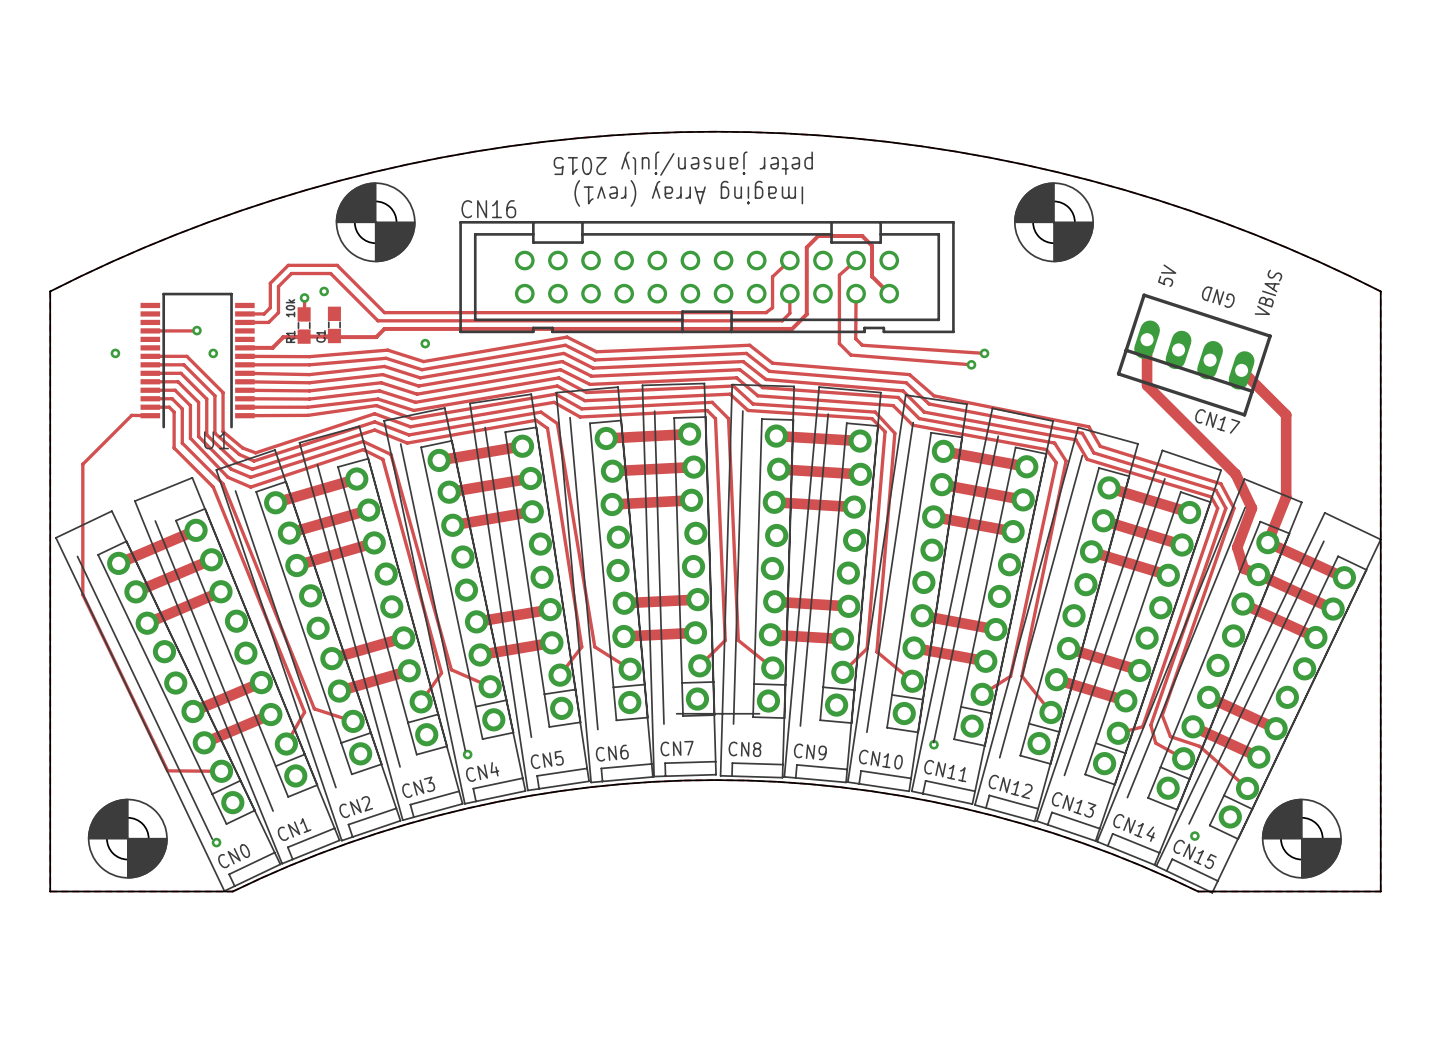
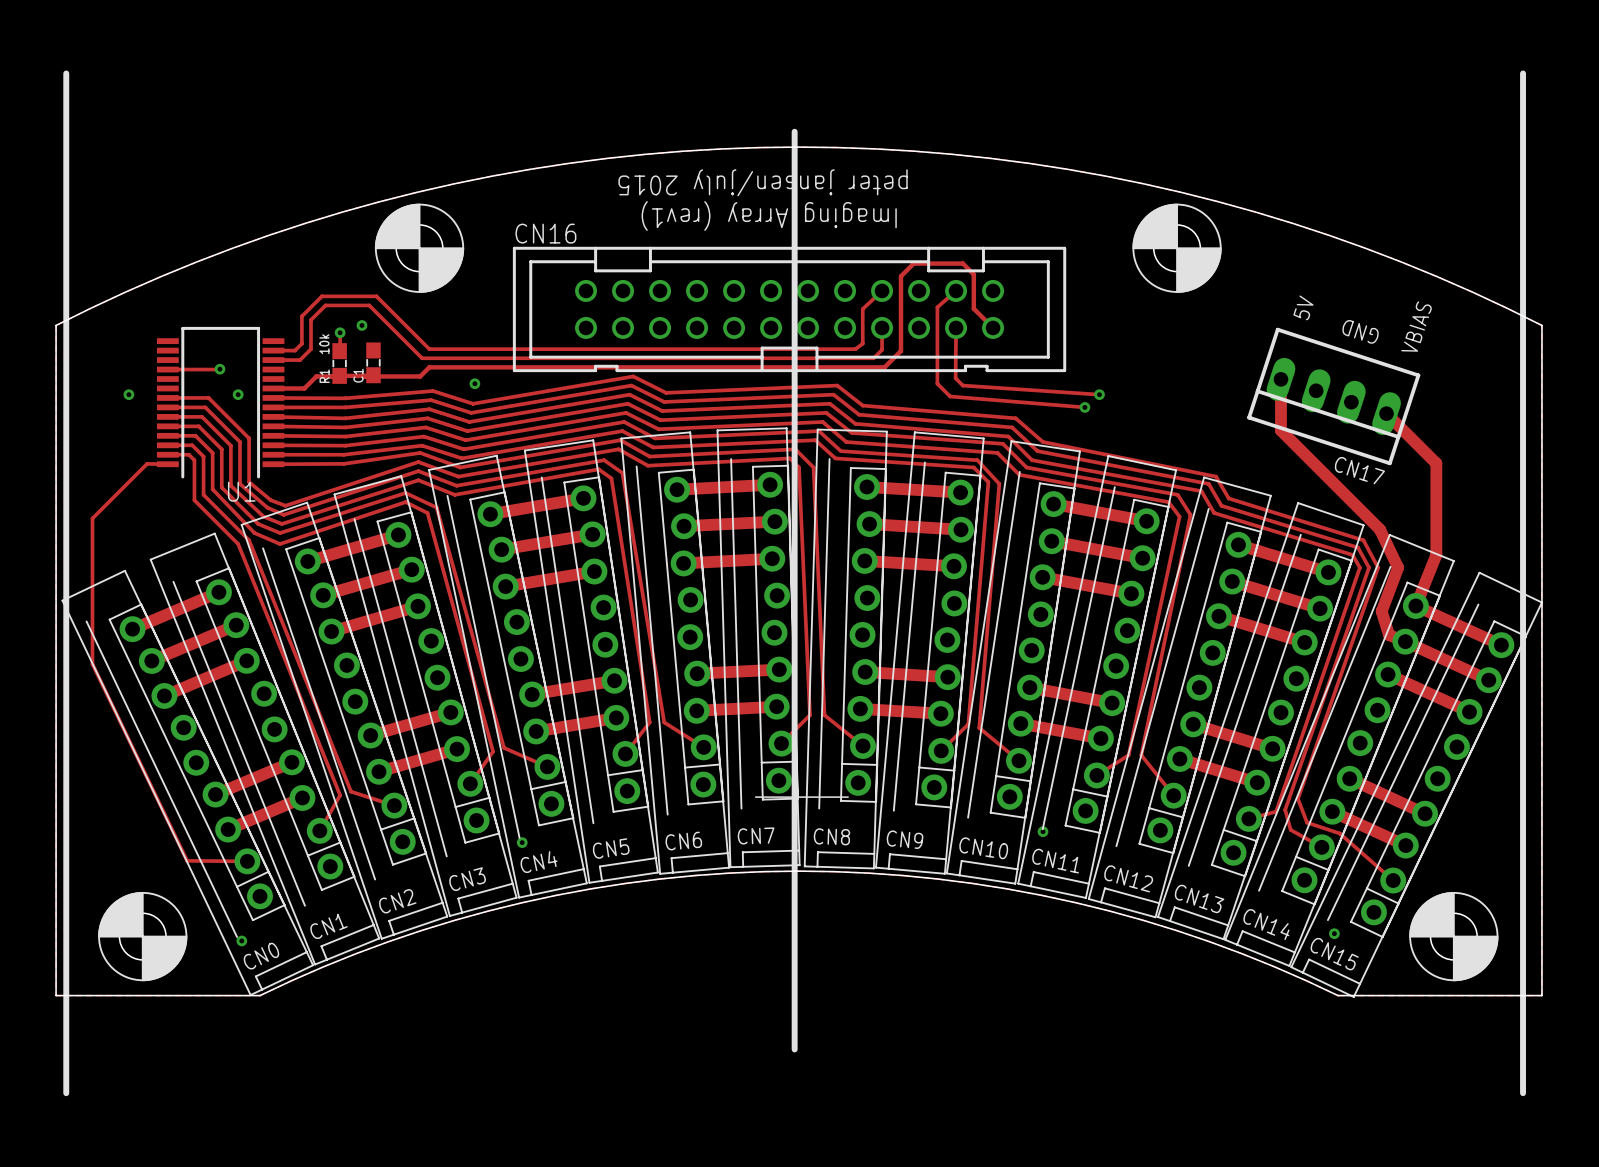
line: none -> (66, 73) (66, 1093)
line: none -> (1523, 73) (1523, 1093)
line: none -> (794, 131) (794, 1049)

